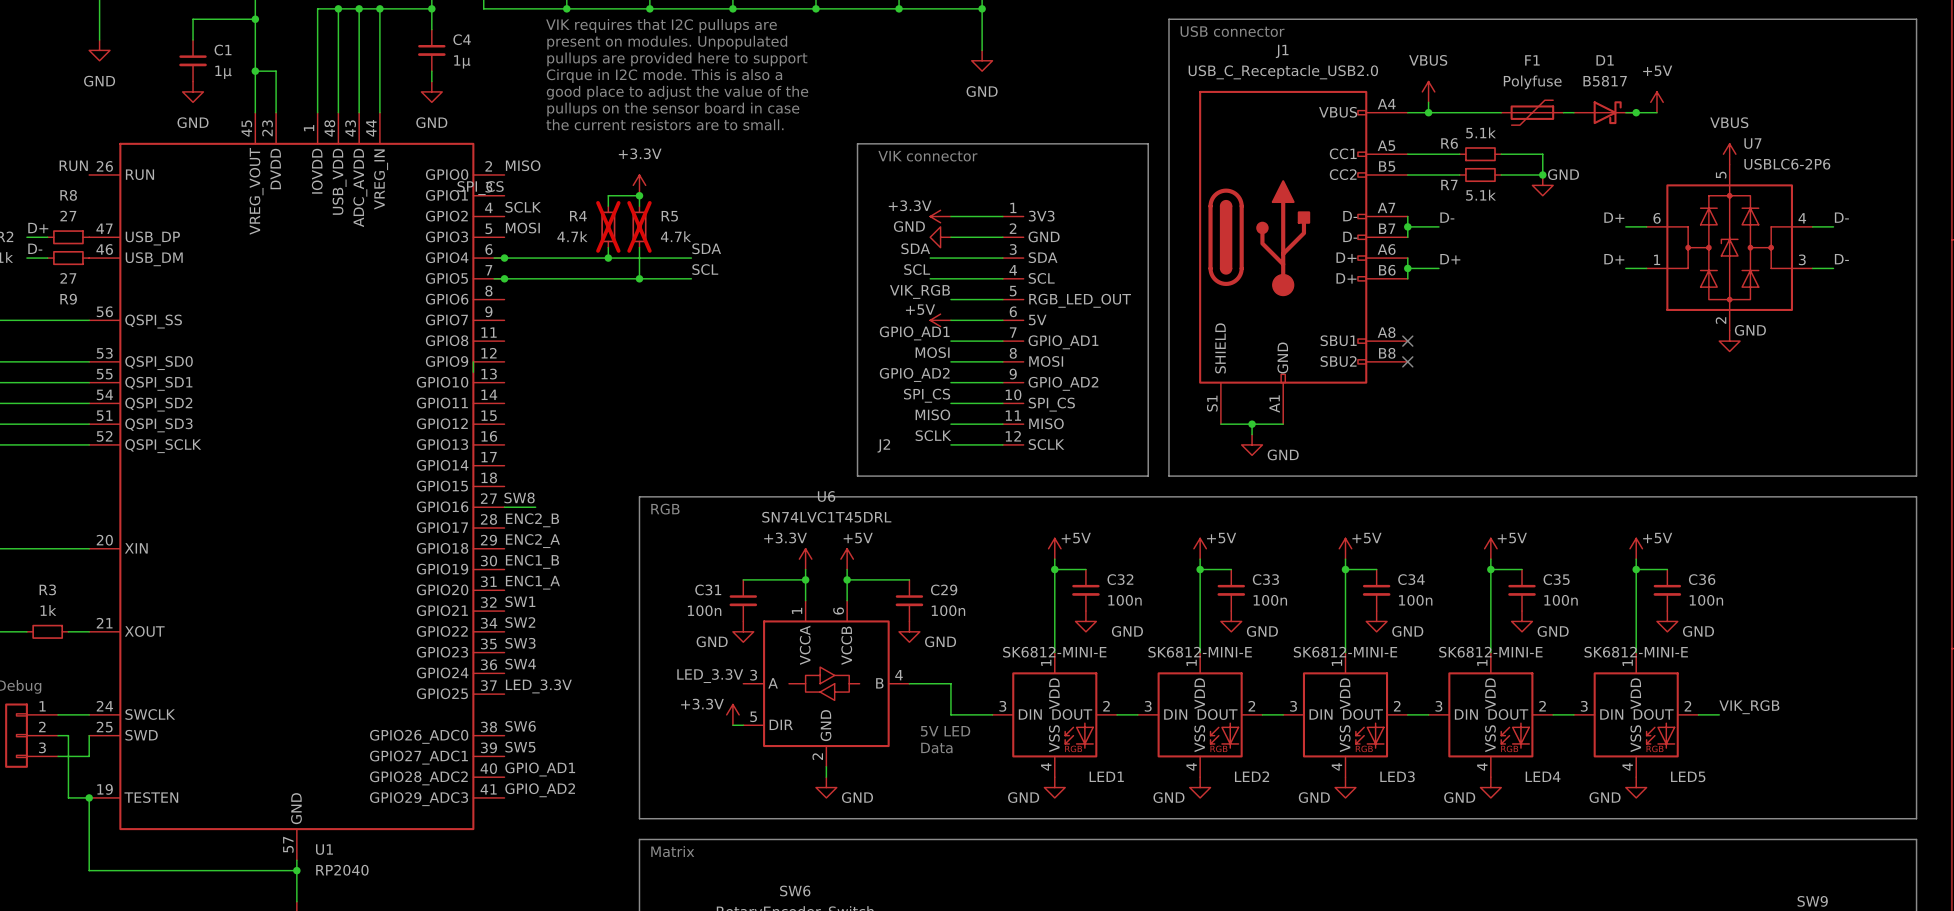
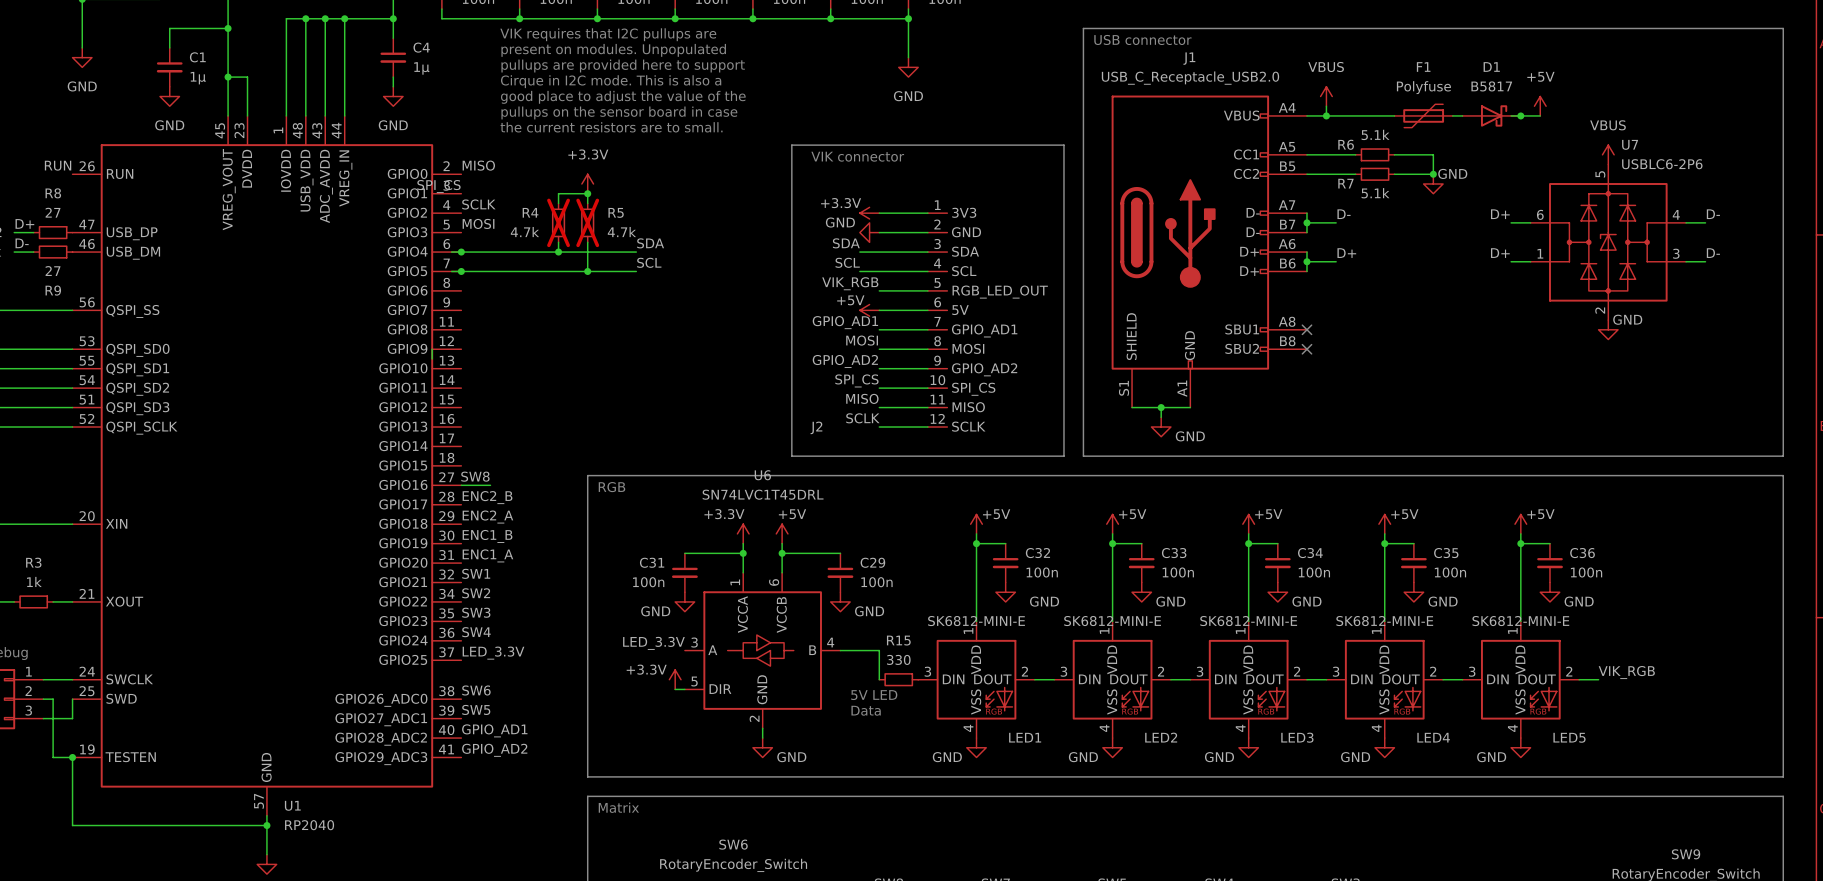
wire: (950, 714) (992, 714) -> none
R15: none -> 330 (898, 679)

